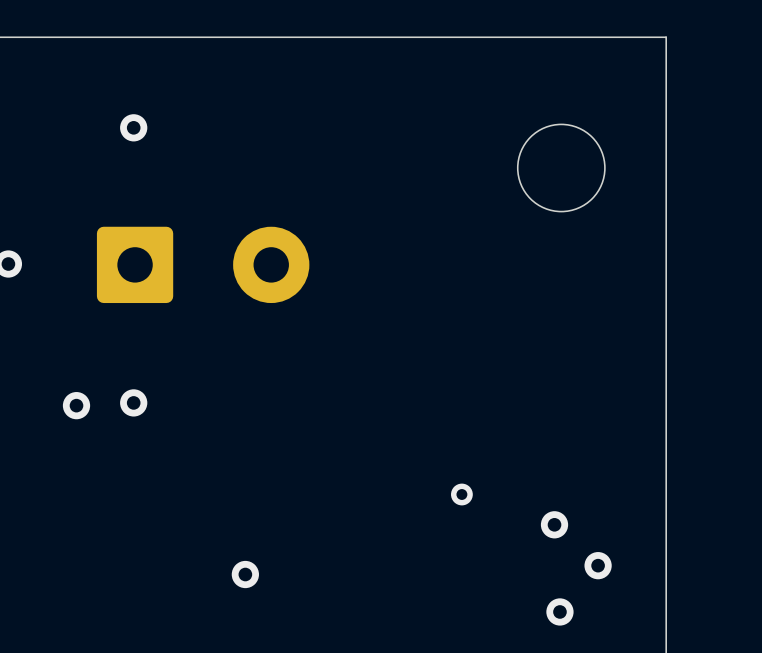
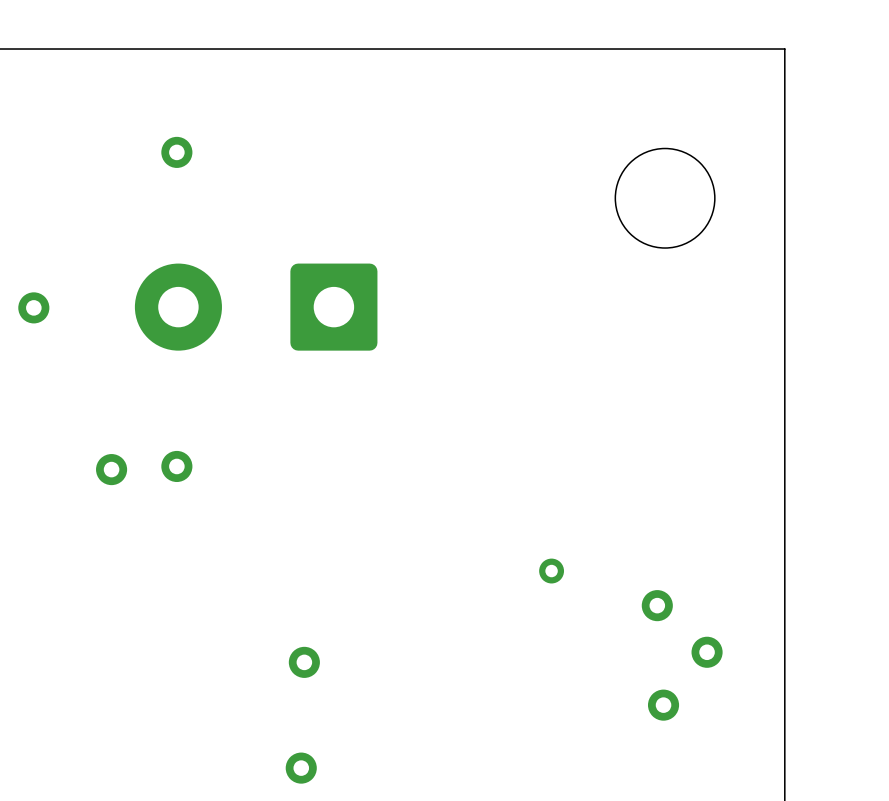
part rotation: 0° (203, 264) -> 180° (256, 307)

